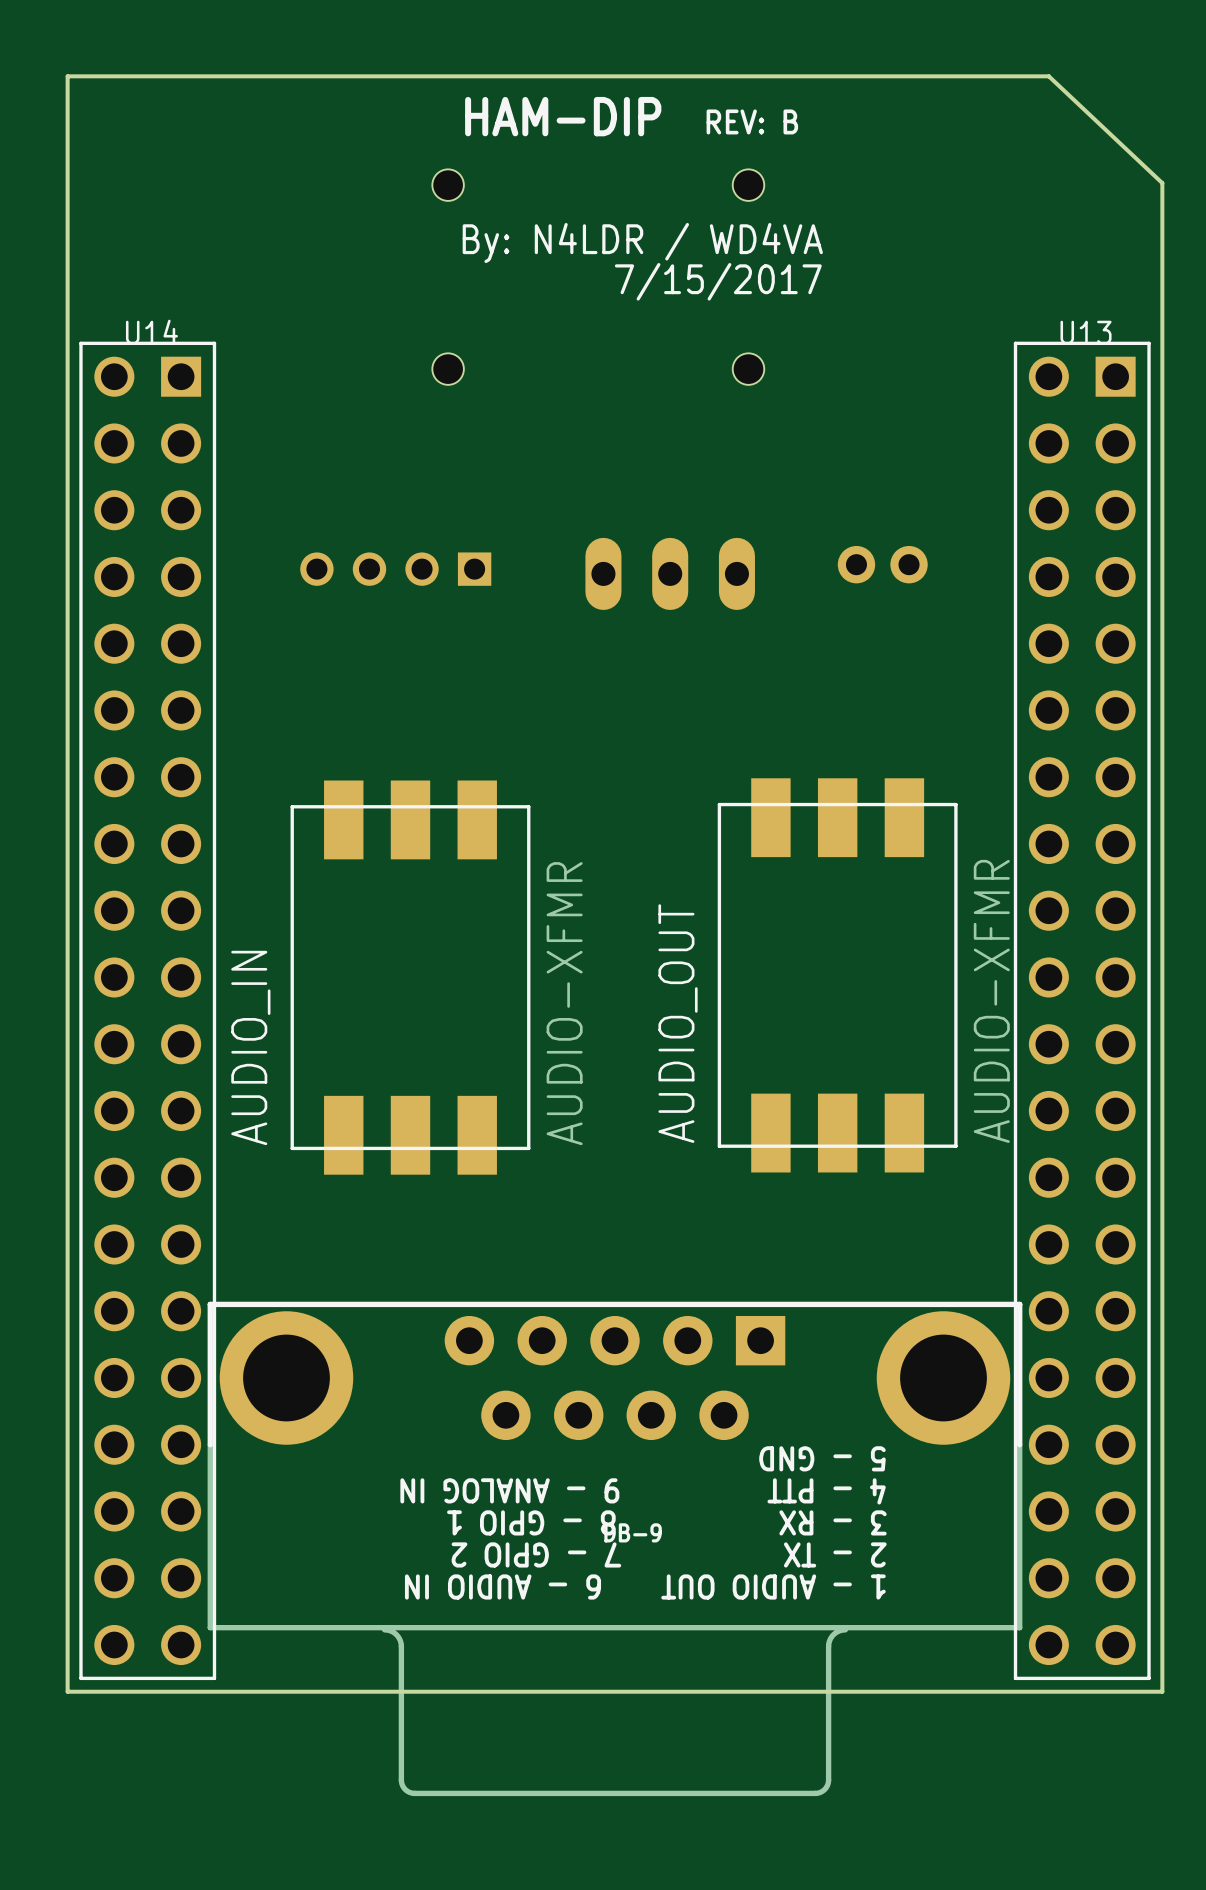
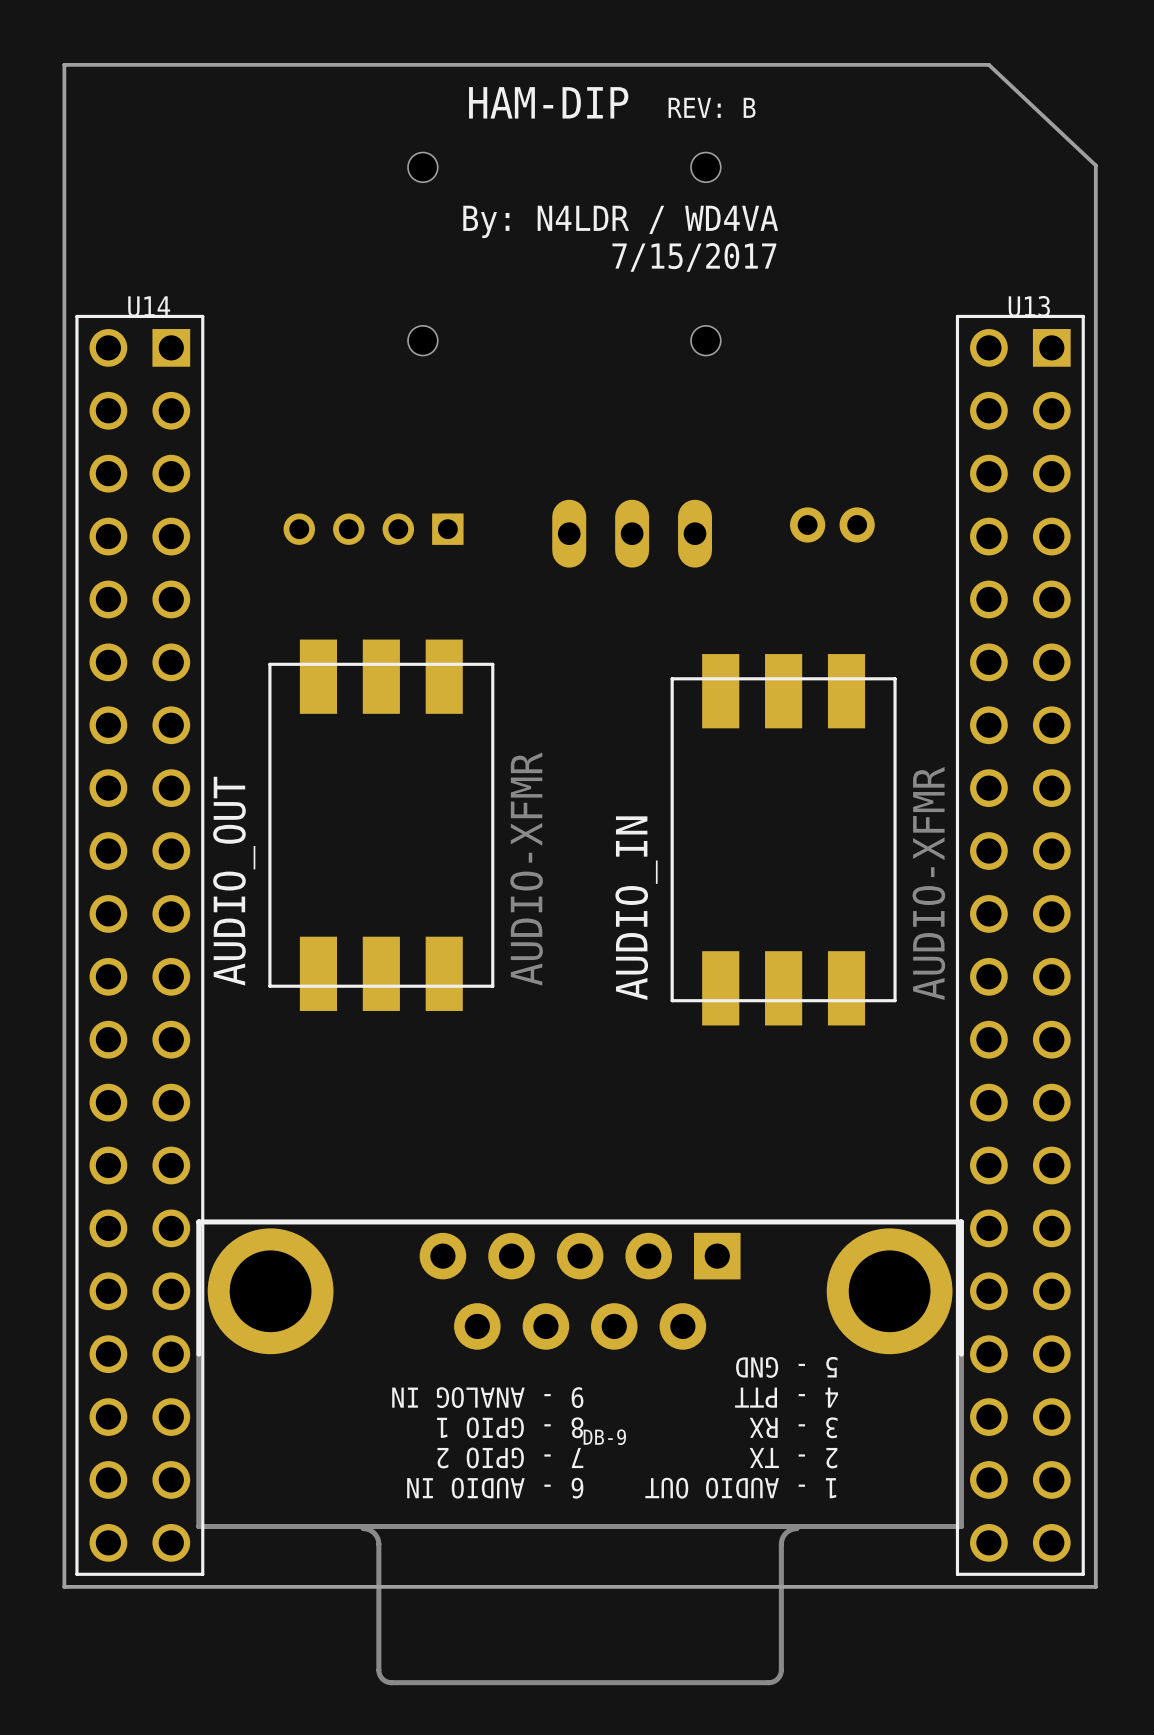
AUDIO_OUT position: (837, 975) -> (381, 825)
AUDIO_IN position: (410, 977) -> (783, 839)

